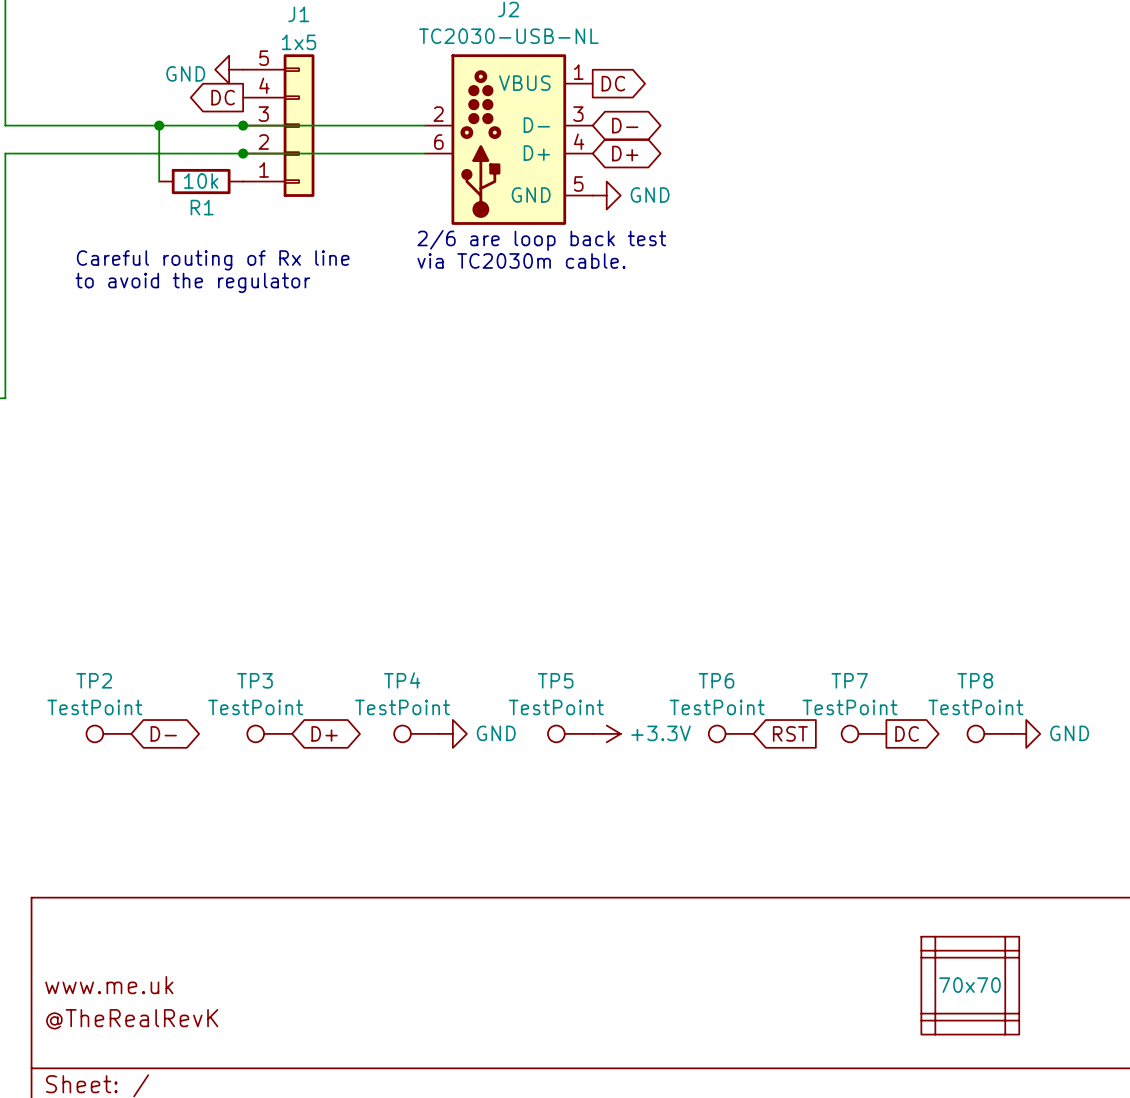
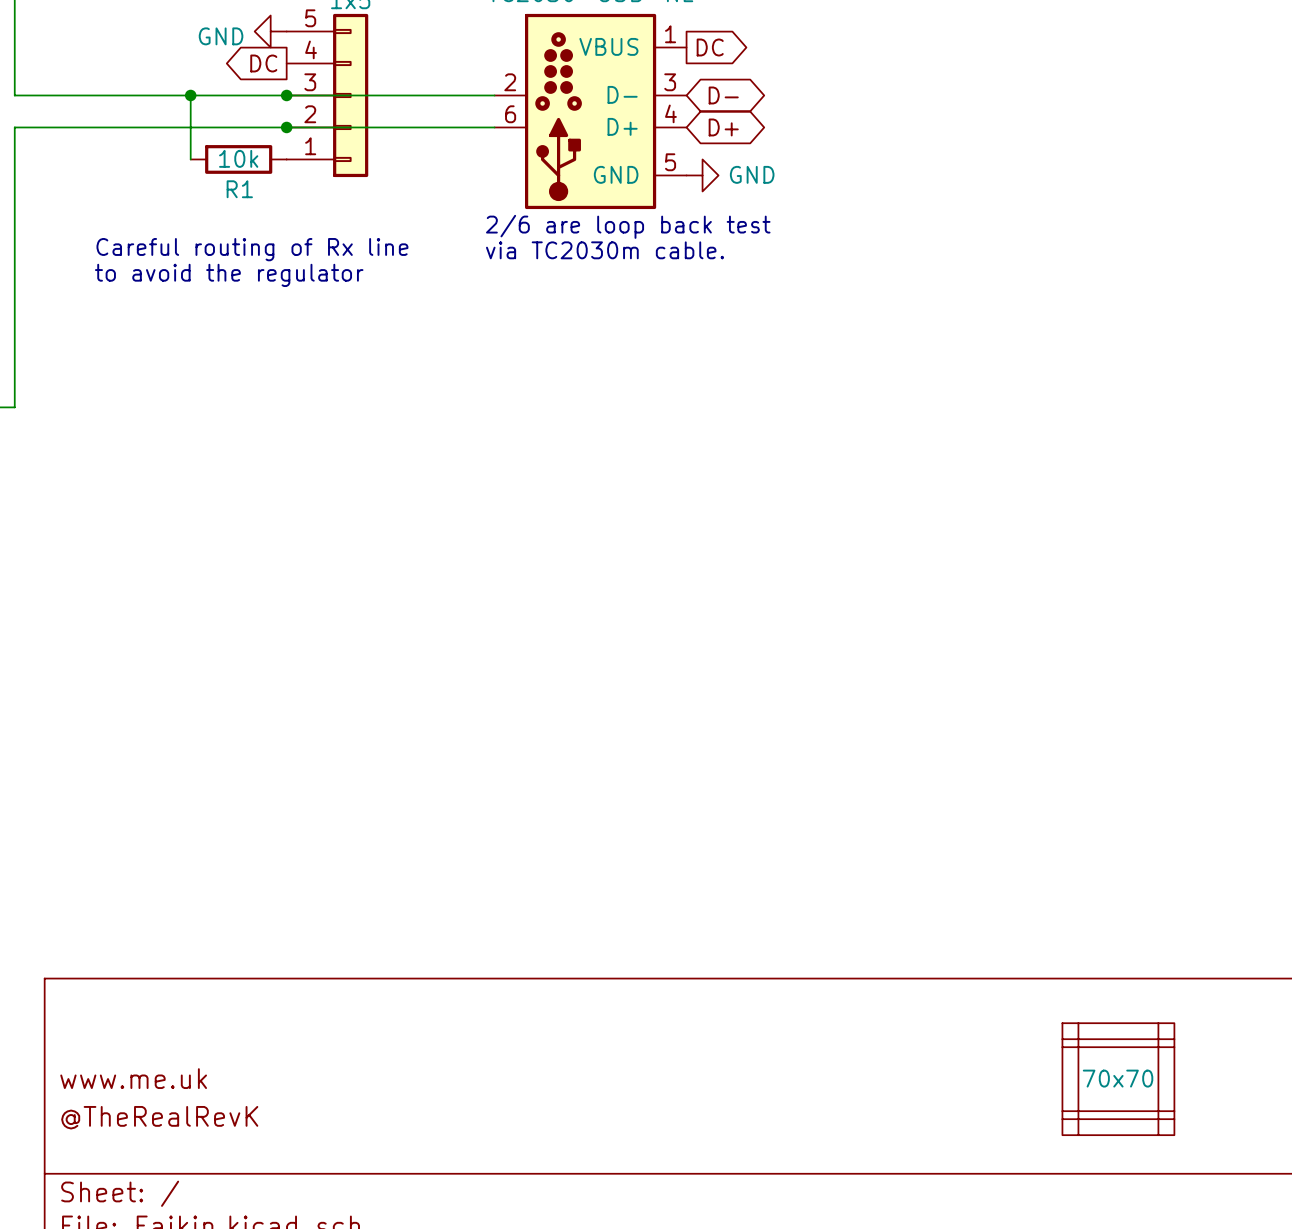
TP2: TestPoint (108, 733) -> none
global label: D- (163, 733) -> none
TP3: TestPoint (269, 733) -> none
global label: D+ (324, 733) -> none
TP4: TestPoint (416, 733) -> none
power symbol: GND (452, 733) -> none
TP5: TestPoint (570, 733) -> none
power symbol: +3.3V (606, 733) -> none
TP6: TestPoint (731, 733) -> none
global label: RST (790, 733) -> none
TP7: TestPoint (864, 733) -> none
global label: DC (907, 733) -> none
TP8: TestPoint (989, 733) -> none
power symbol: GND (1026, 733) -> none

